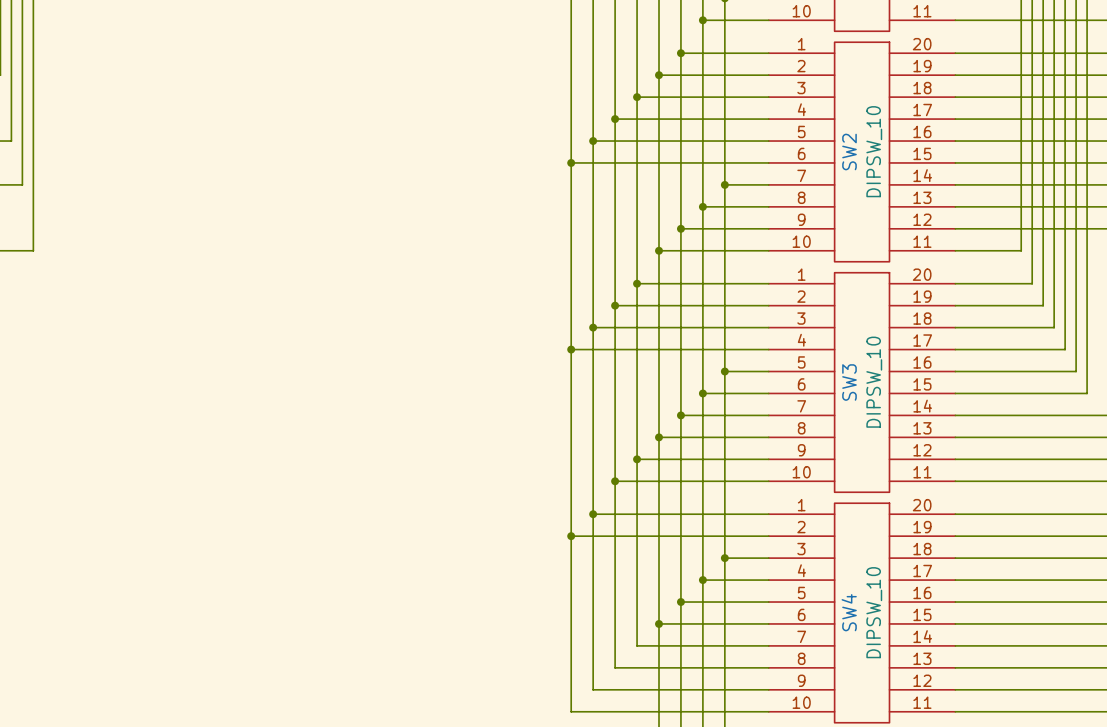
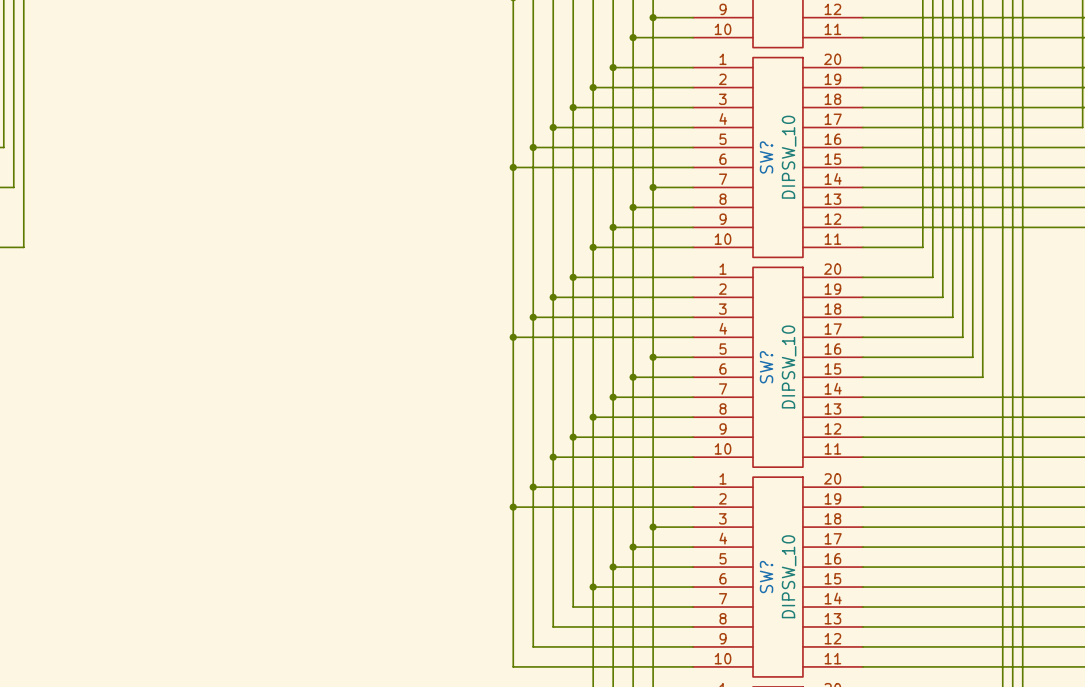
SW2 name: SW2 (849, 151) -> SW? (766, 157)
SW3 name: SW3 (849, 382) -> SW? (766, 367)
SW4 name: SW4 (849, 612) -> SW? (766, 577)

